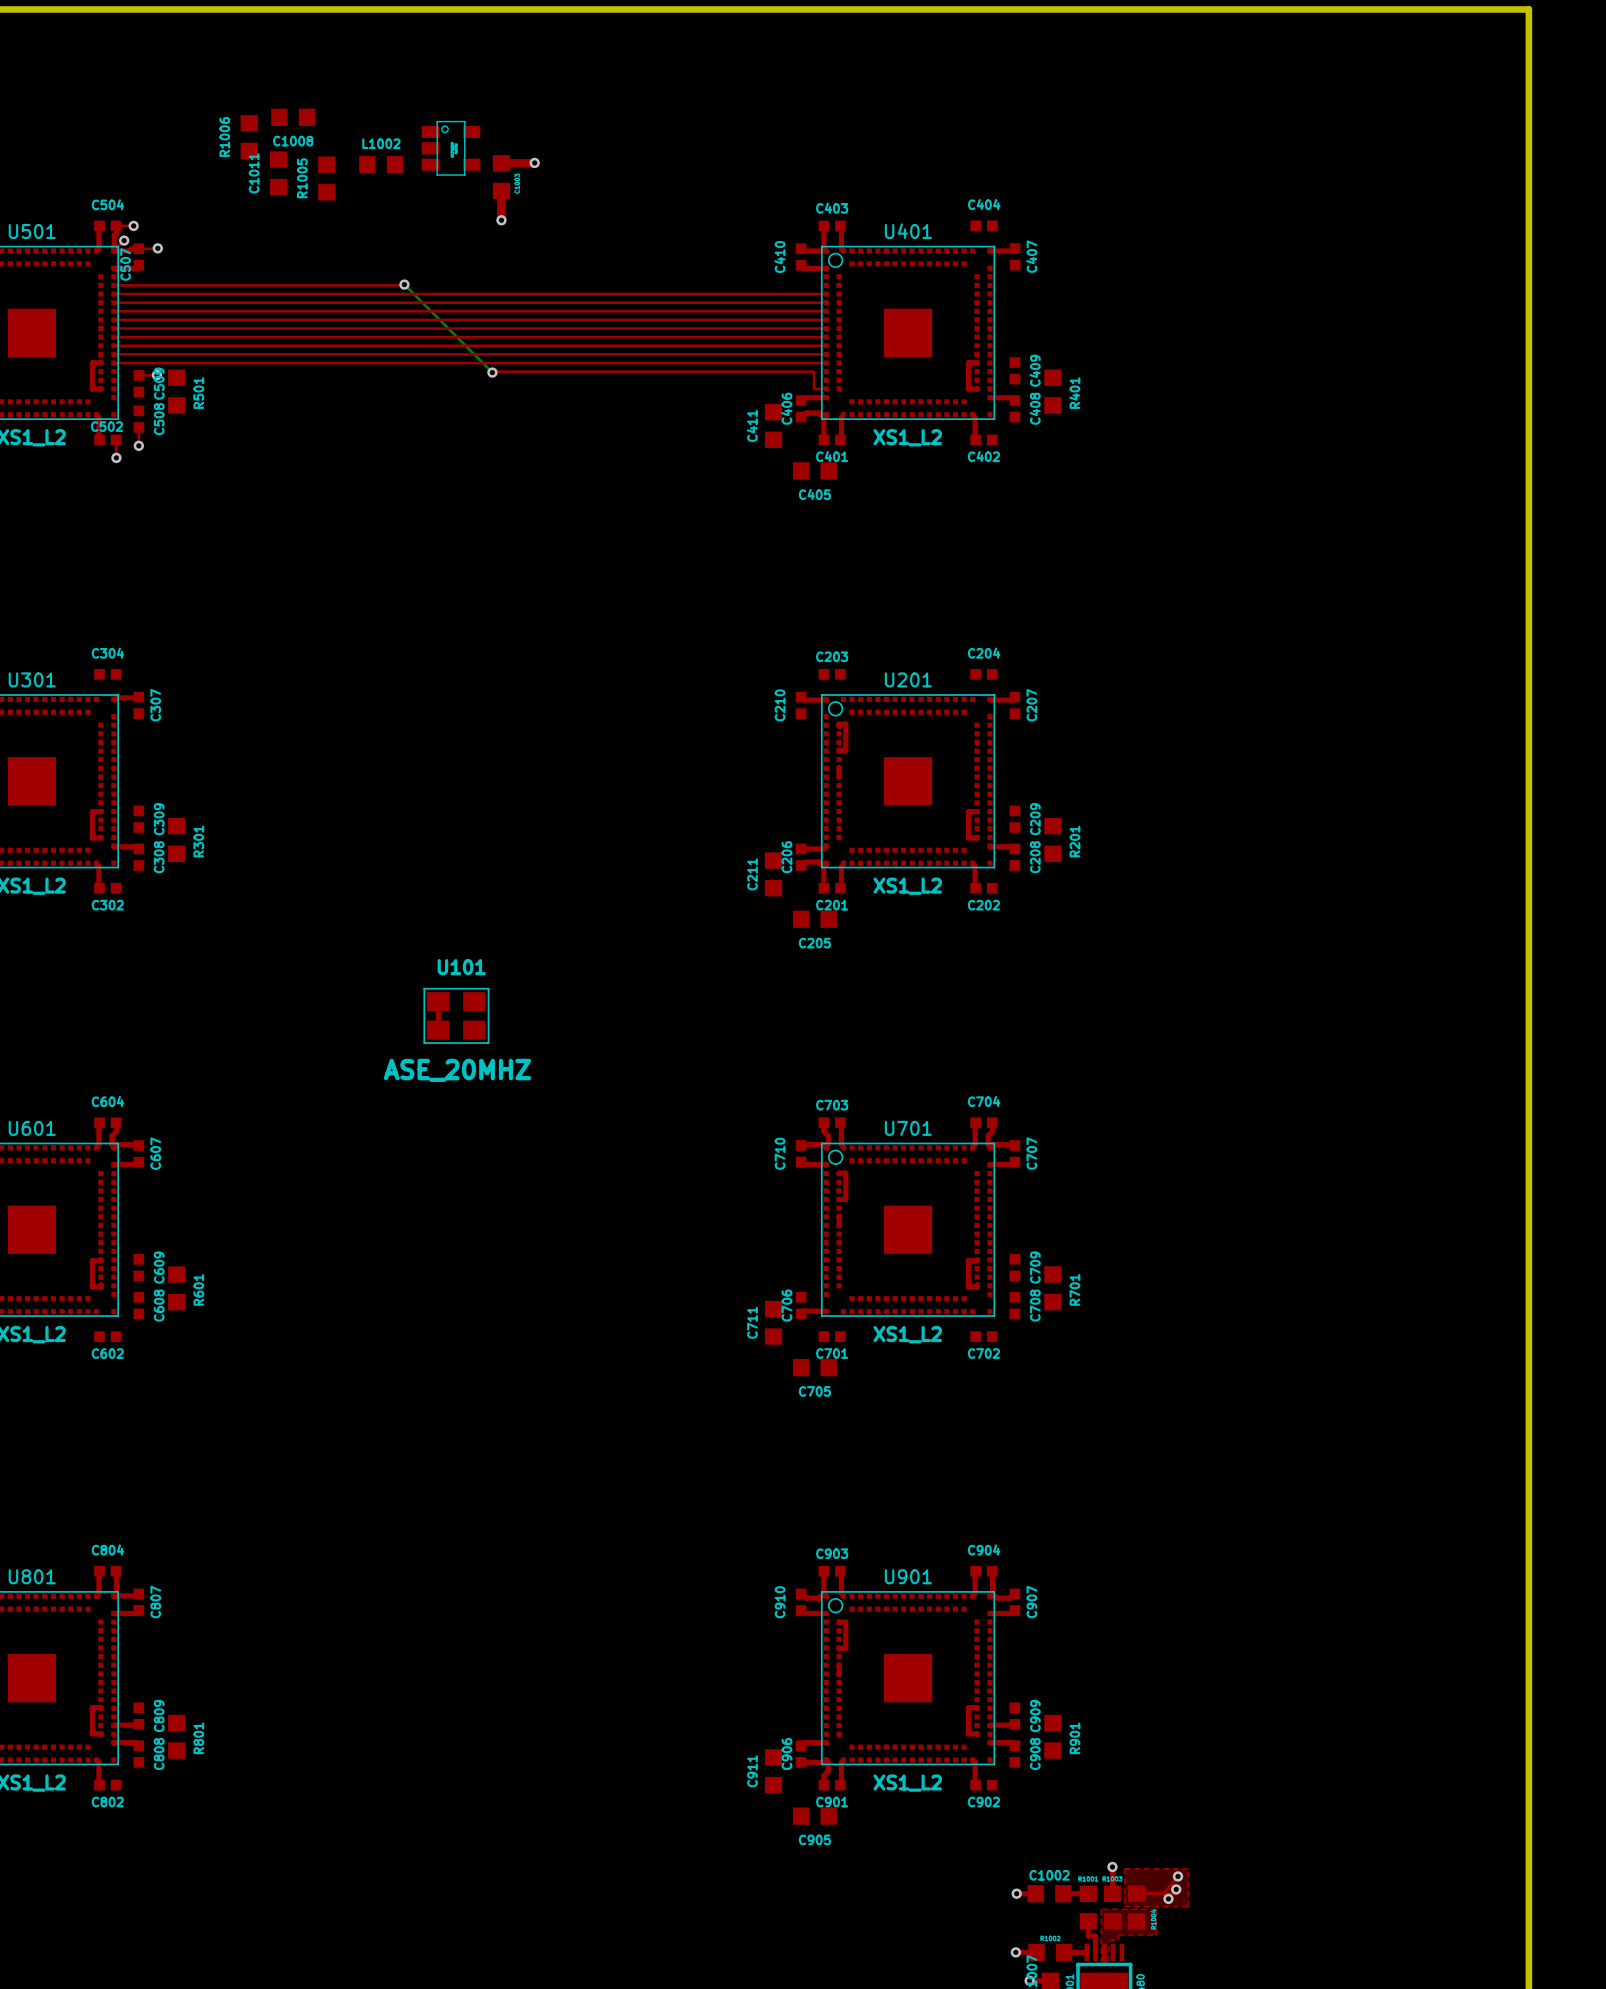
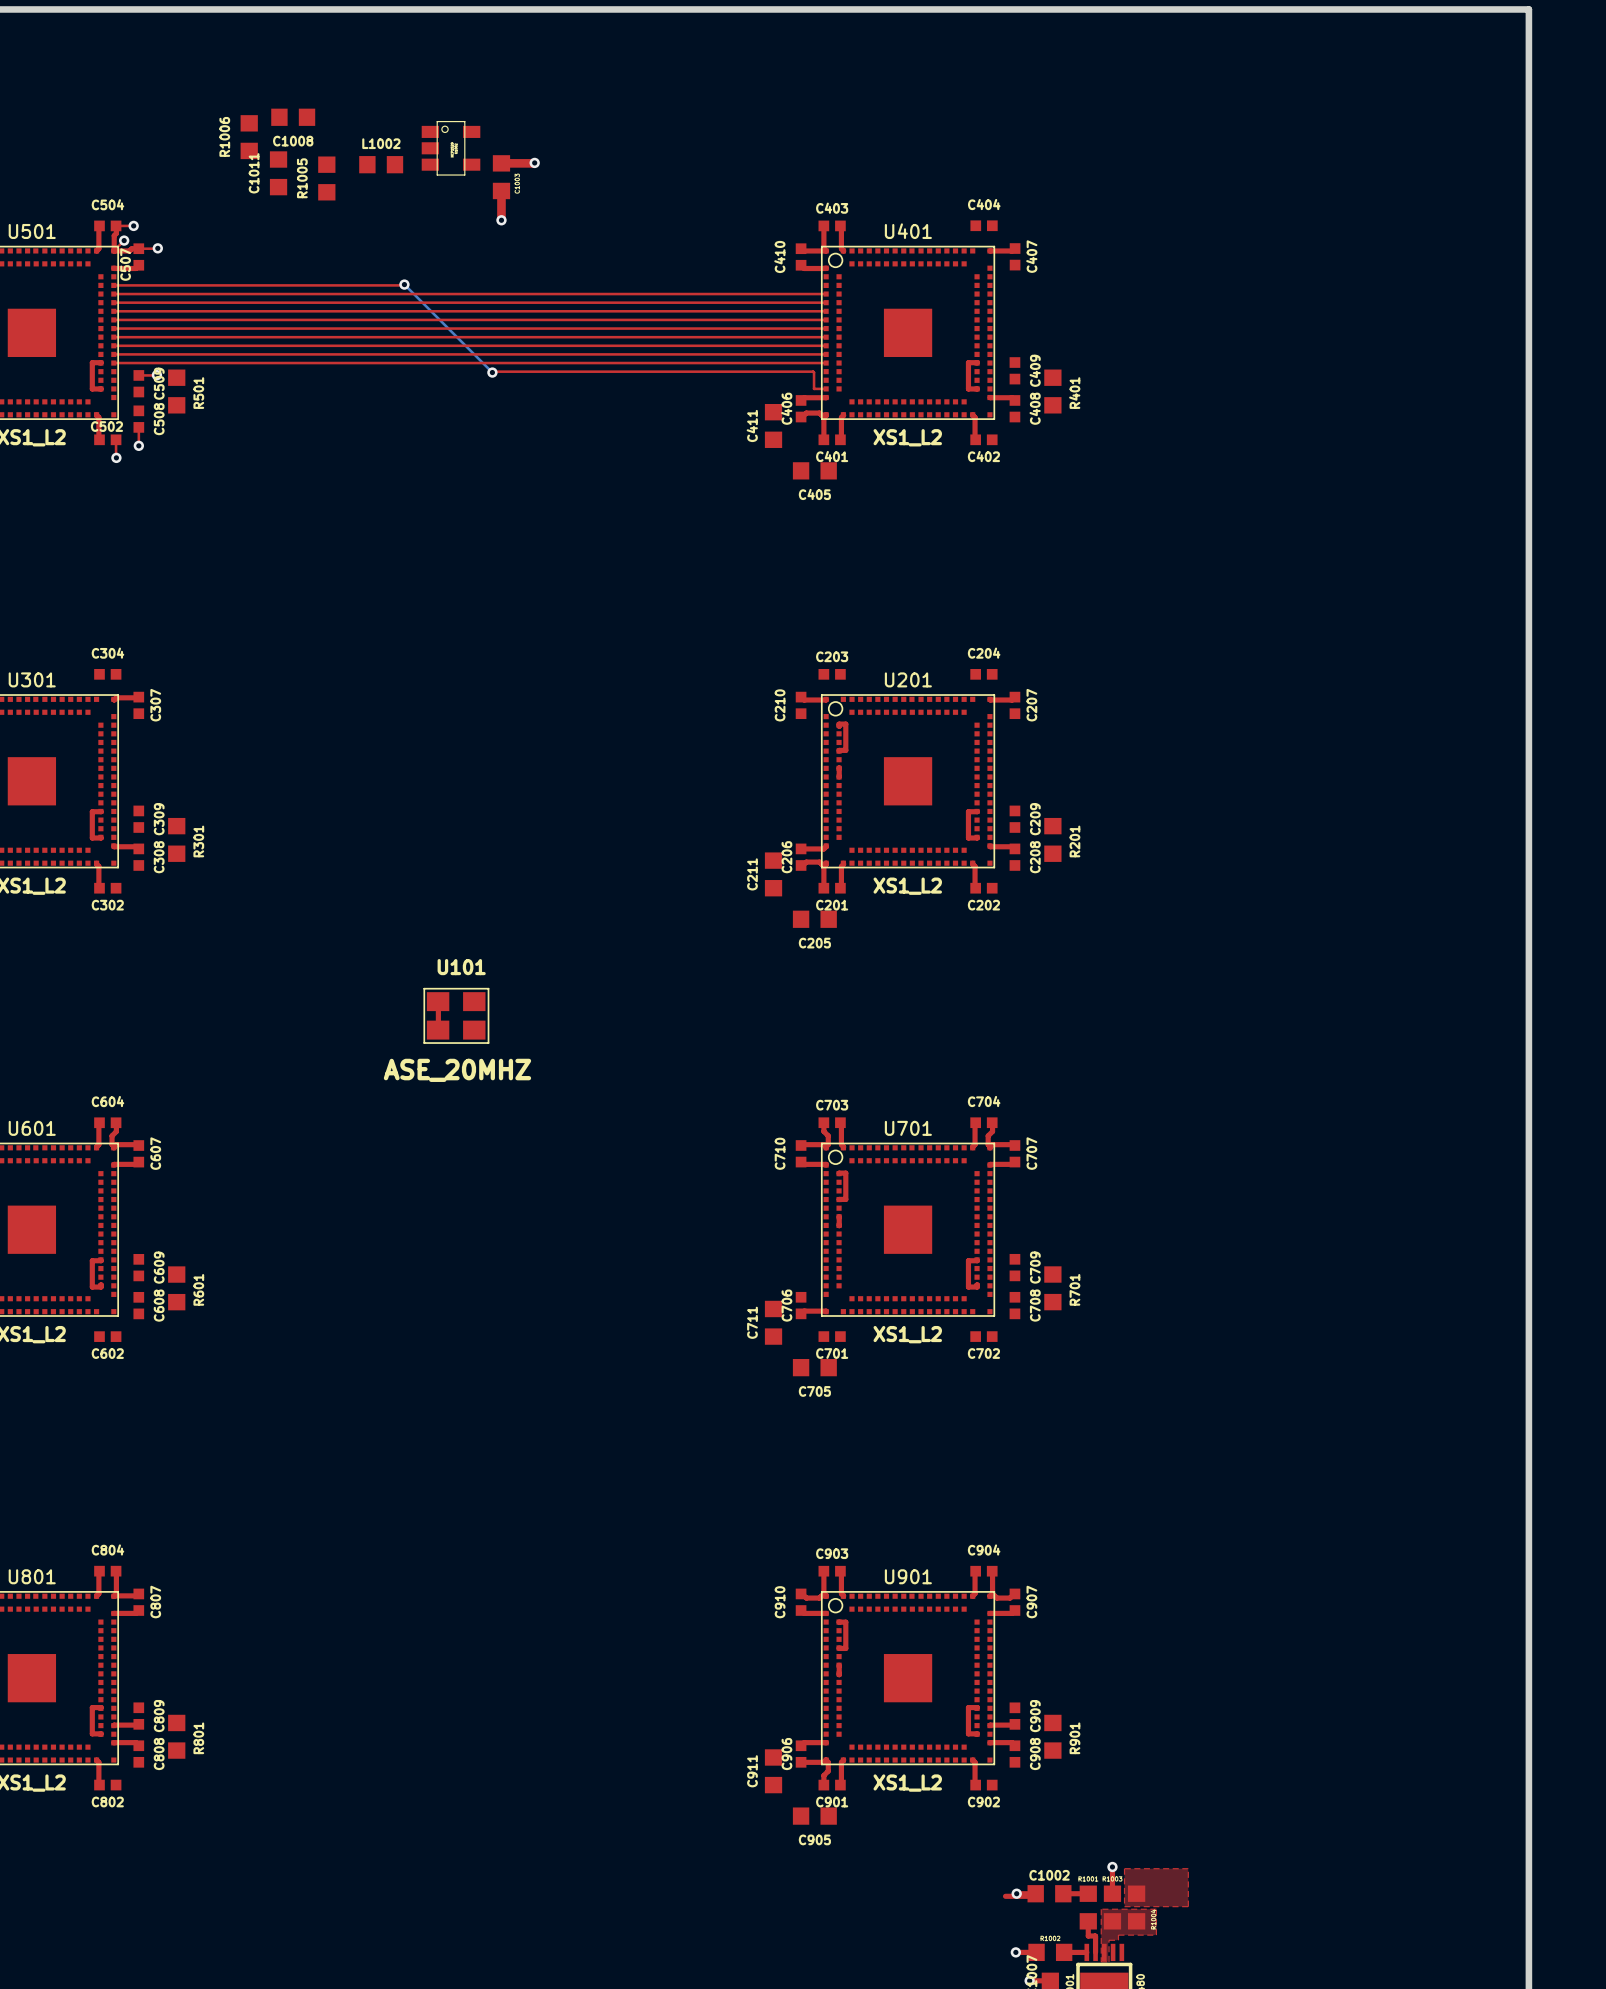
top track: (1178, 1876) (1163, 1893) (1168, 1898) -> none
via: (1178, 1876) -> none
top track: (1176, 1889) (1176, 1893) (1136, 1893) -> none
via: (1176, 1889) -> none
top track: none -> (1005, 1896) (1027, 1896)
via: (1168, 1898) -> none

